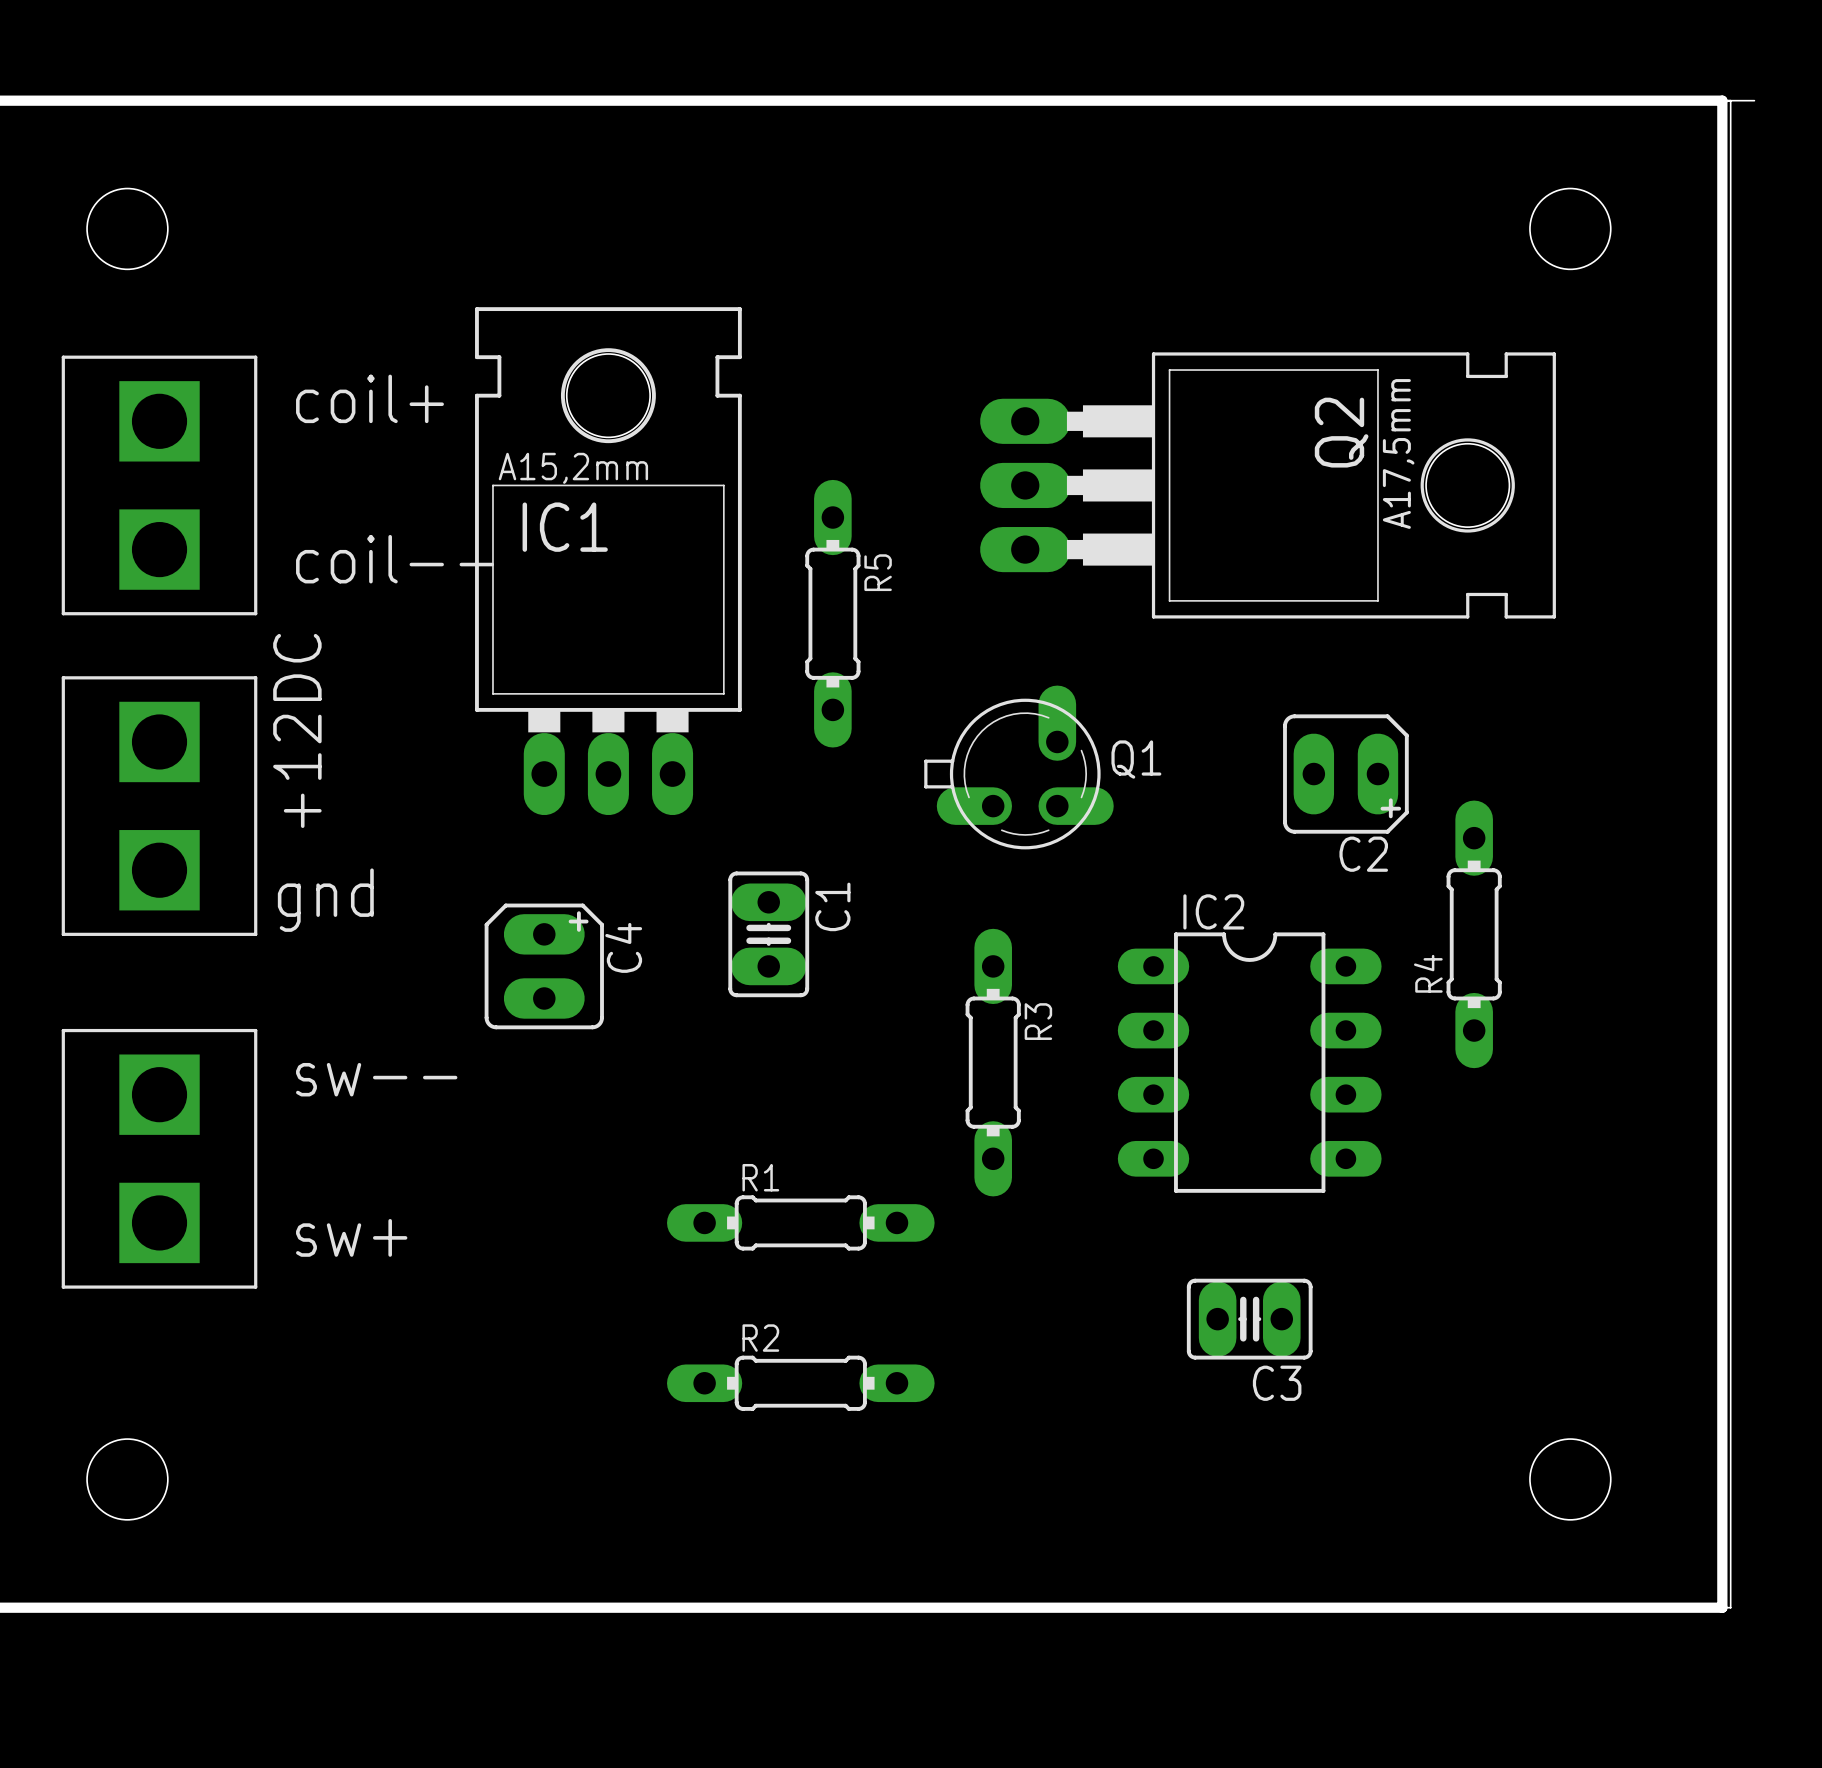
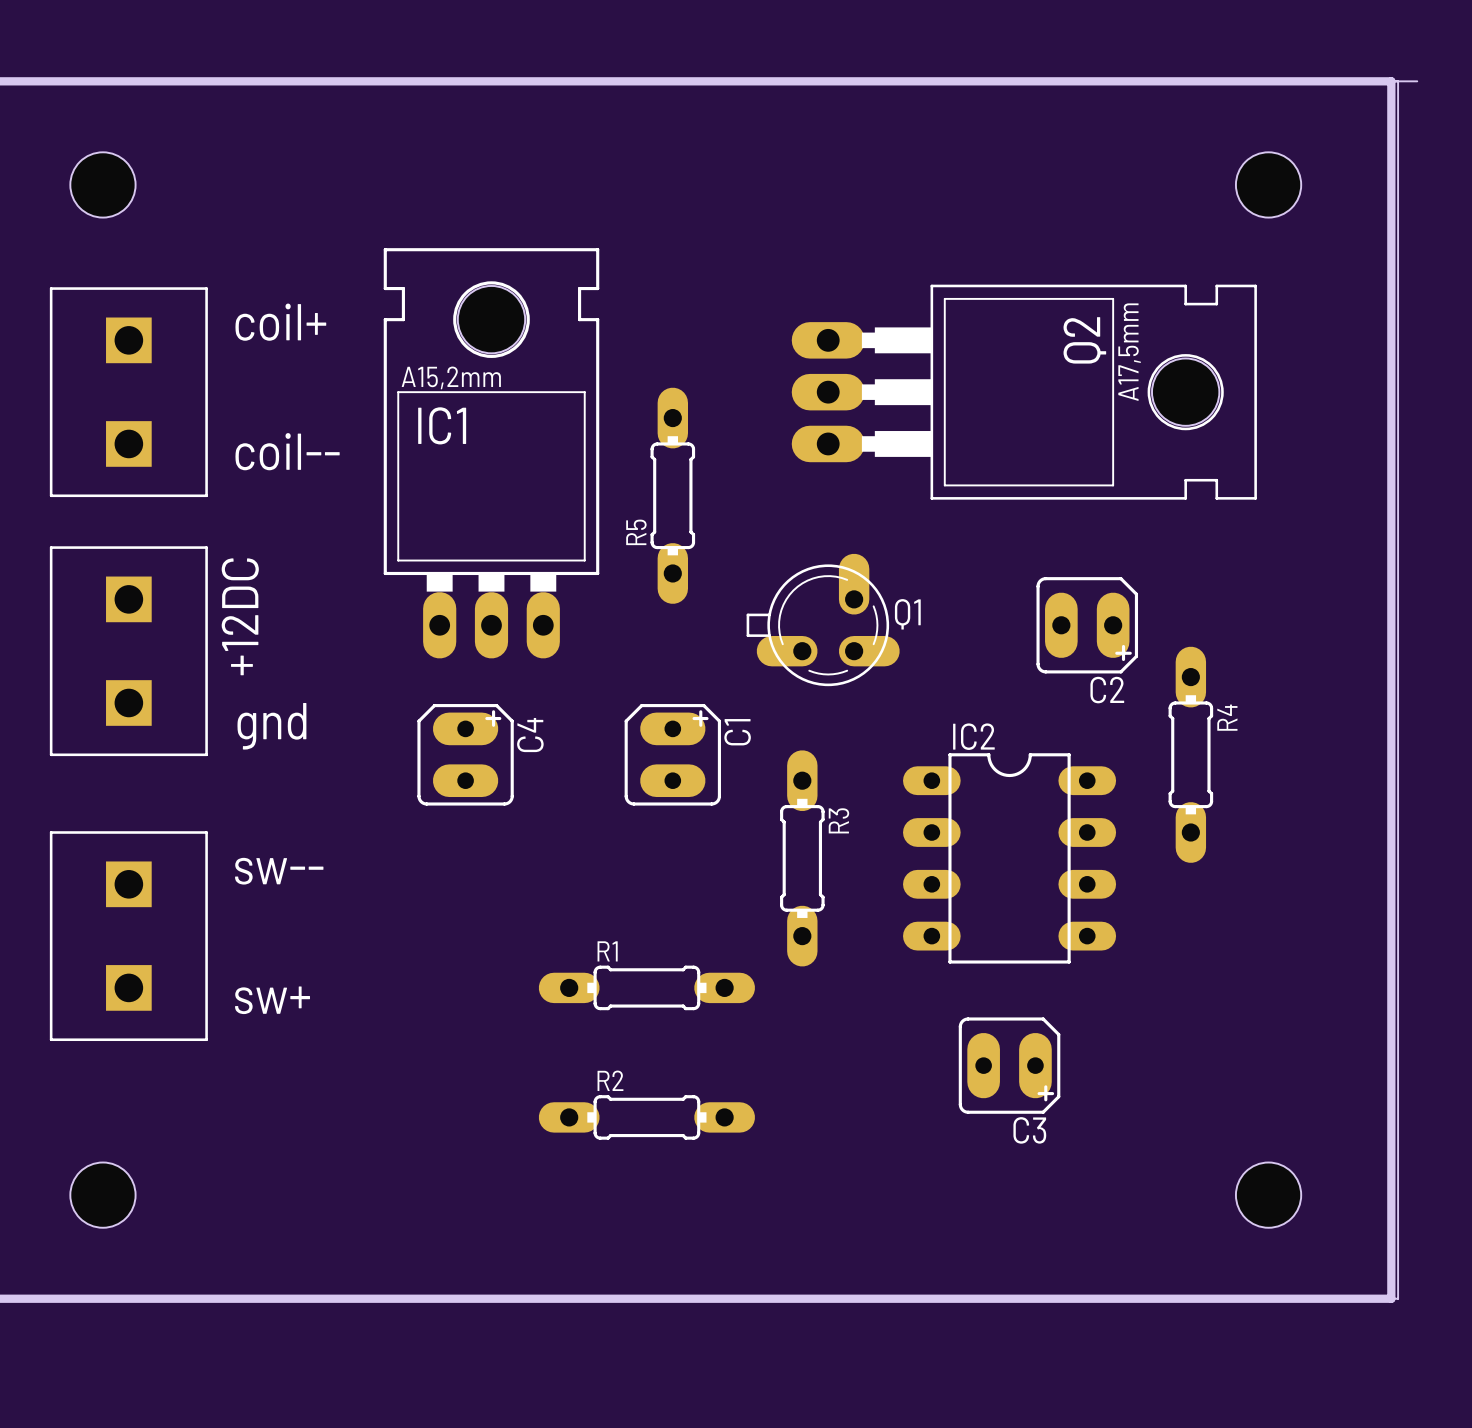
part footprint: [61, 355, 258, 616] -> [49, 287, 208, 498]
R5 name position: R5 (878, 572) -> R5 (636, 532)
part footprint: [61, 676, 258, 936] -> [49, 546, 208, 757]
C1 footprint: [728, 871, 810, 998] -> [624, 704, 721, 806]
C4 footprint: [484, 903, 604, 1030] -> [417, 704, 514, 806]
R4 name position: R4 (1428, 973) -> R4 (1227, 717)
part footprint: [61, 1028, 258, 1289] -> [49, 831, 208, 1042]
C3 footprint: [1186, 1278, 1313, 1360] -> [958, 1017, 1061, 1114]

